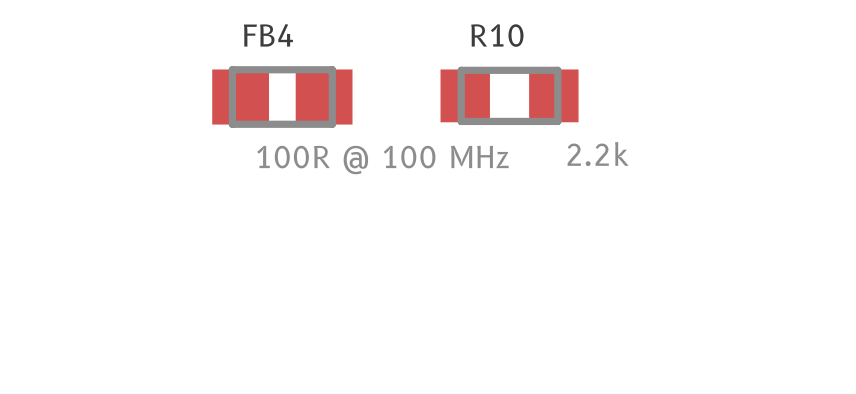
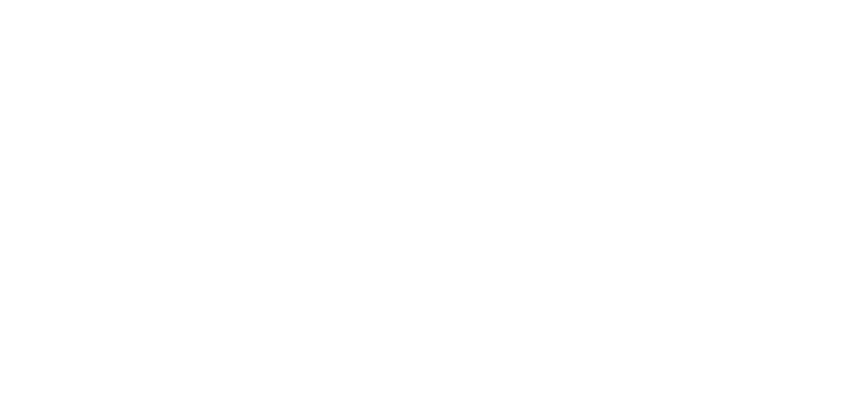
R10: 2.2k (509, 95) -> none
FB4: 100R @ 100 MHz (282, 97) -> none

